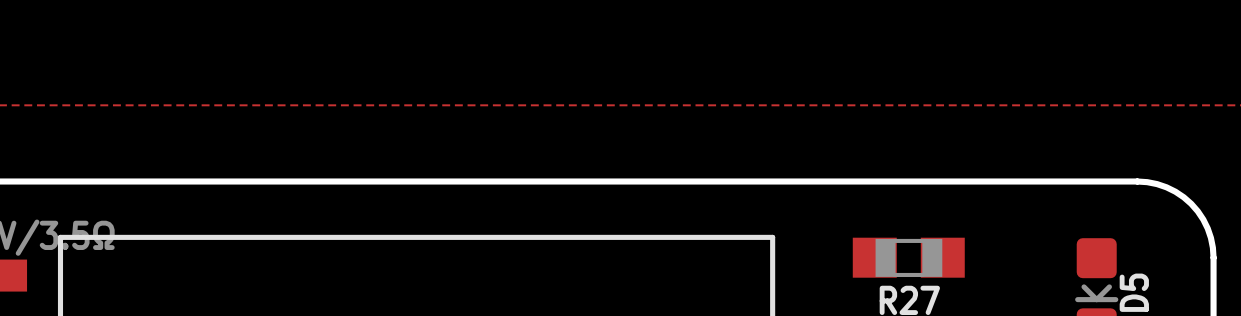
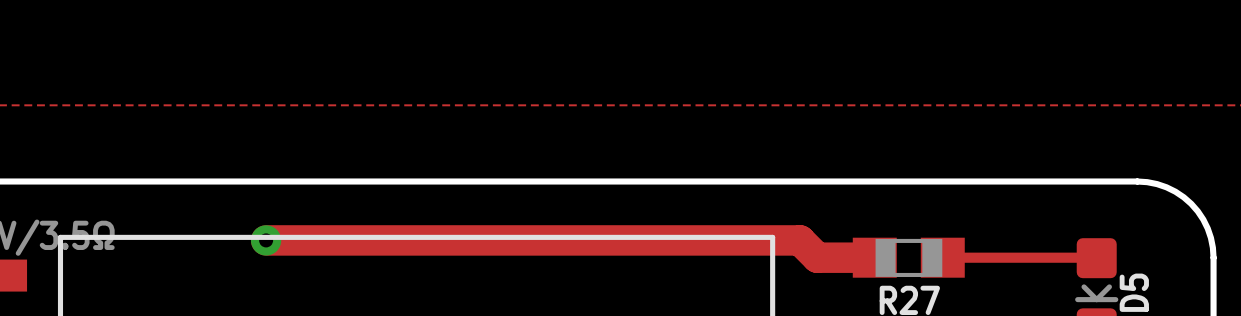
track: none -> (266, 240) (800, 240) (817, 257) (874, 257)
via: none -> (266, 240)
track: none -> (942, 257) (1096, 257)

